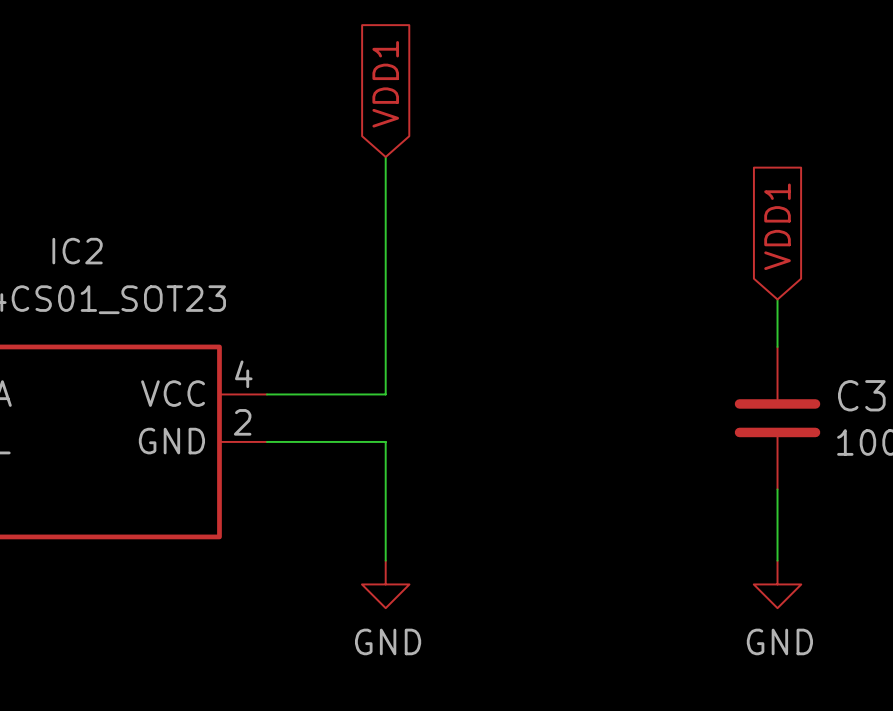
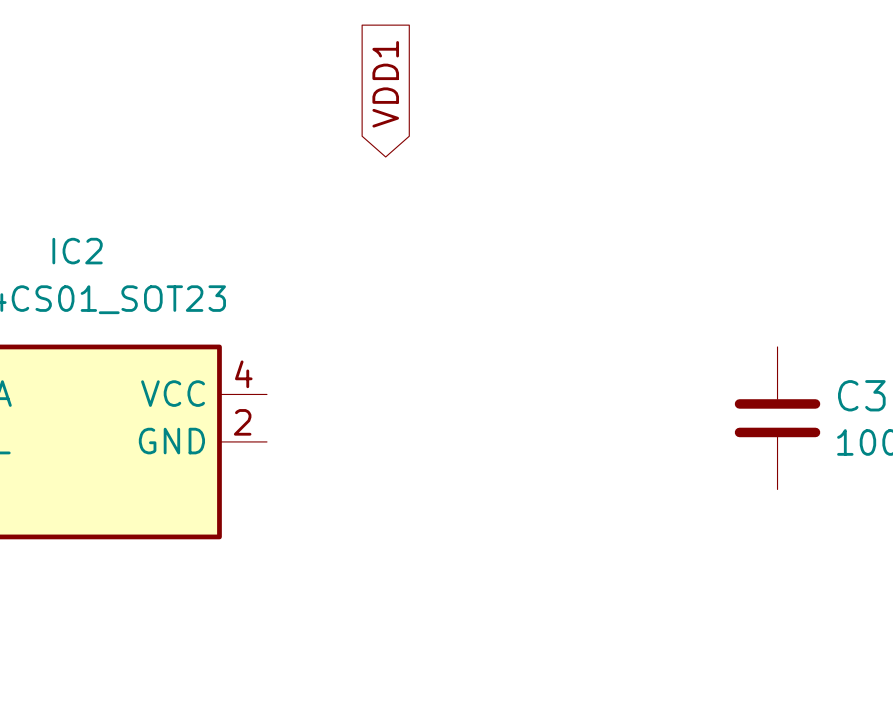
wire: (385, 156) (385, 394) (266, 394) -> none
global label: VDD1 (777, 226) -> none
wire: (777, 299) (777, 346) -> none
wire: (266, 441) (385, 441) (385, 560) -> none
wire: (777, 489) (777, 560) -> none
power symbol: GND (385, 584) -> none
power symbol: GND (777, 584) -> none

